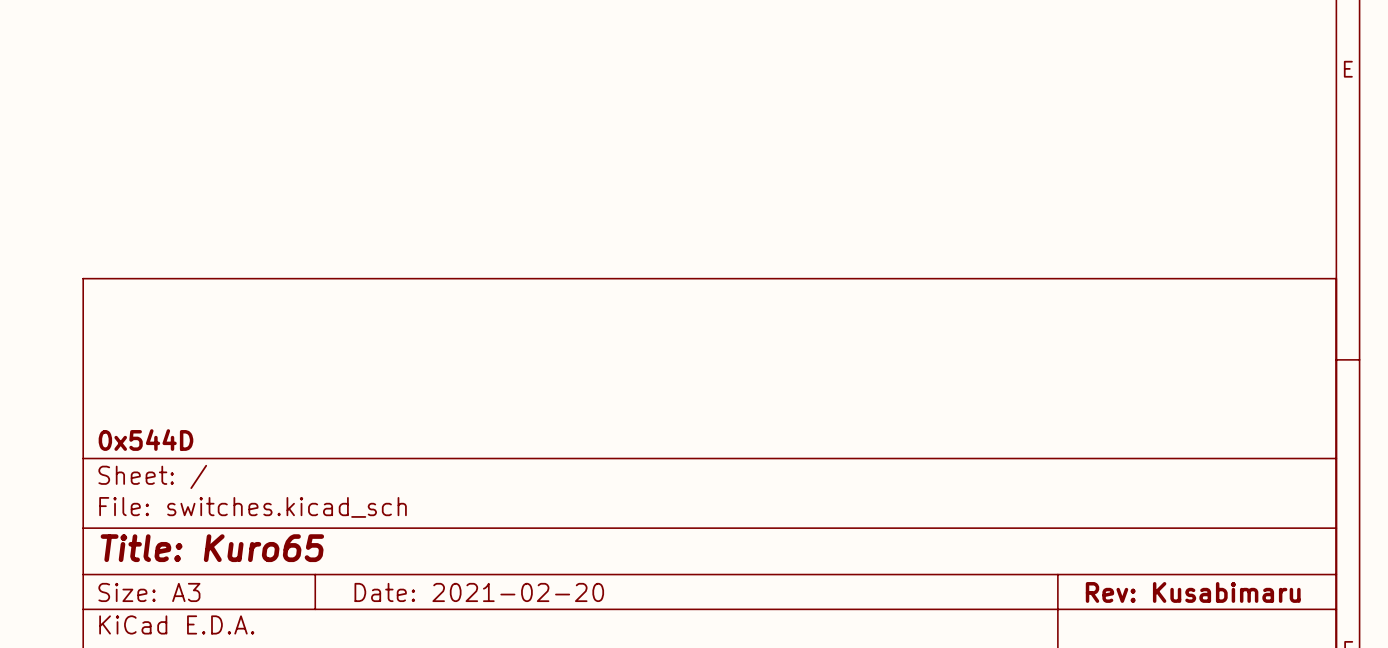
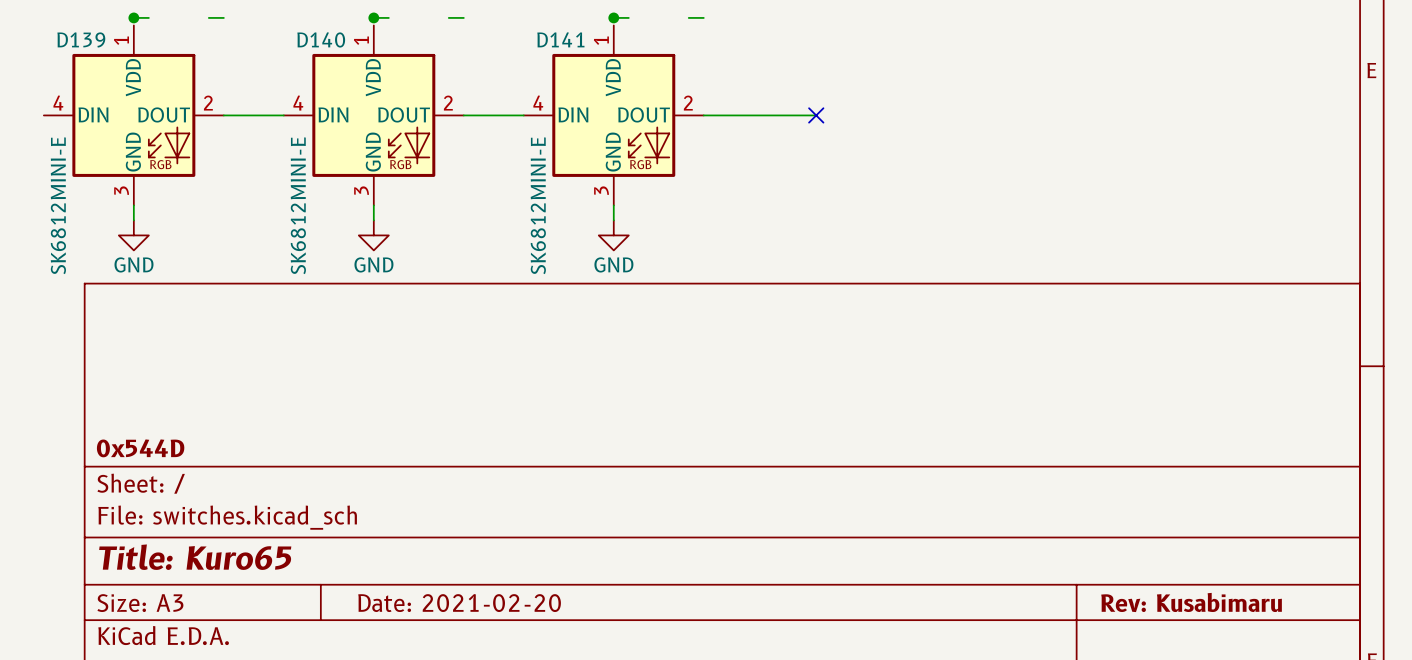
wire: none -> (133, 17) (148, 17)
junction: none -> (133, 17)
wire: none -> (208, 17) (223, 17)
wire: none -> (373, 17) (388, 17)
junction: none -> (373, 17)
wire: none -> (448, 17) (463, 17)
wire: none -> (613, 17) (628, 17)
junction: none -> (613, 17)
wire: none -> (688, 17) (703, 17)
D139: none -> SK6812MINI-E (133, 115)
wire: none -> (223, 115) (283, 115)
D140: none -> SK6812MINI-E (373, 115)
wire: none -> (463, 115) (523, 115)
D141: none -> SK6812MINI-E (613, 115)
wire: none -> (703, 115) (816, 115)
no-connect mark: none -> (816, 115)
wire: none -> (133, 205) (133, 220)
wire: none -> (373, 205) (373, 220)
wire: none -> (613, 205) (613, 220)
power symbol: none -> GND (133, 235)
power symbol: none -> GND (373, 235)
power symbol: none -> GND (613, 235)

